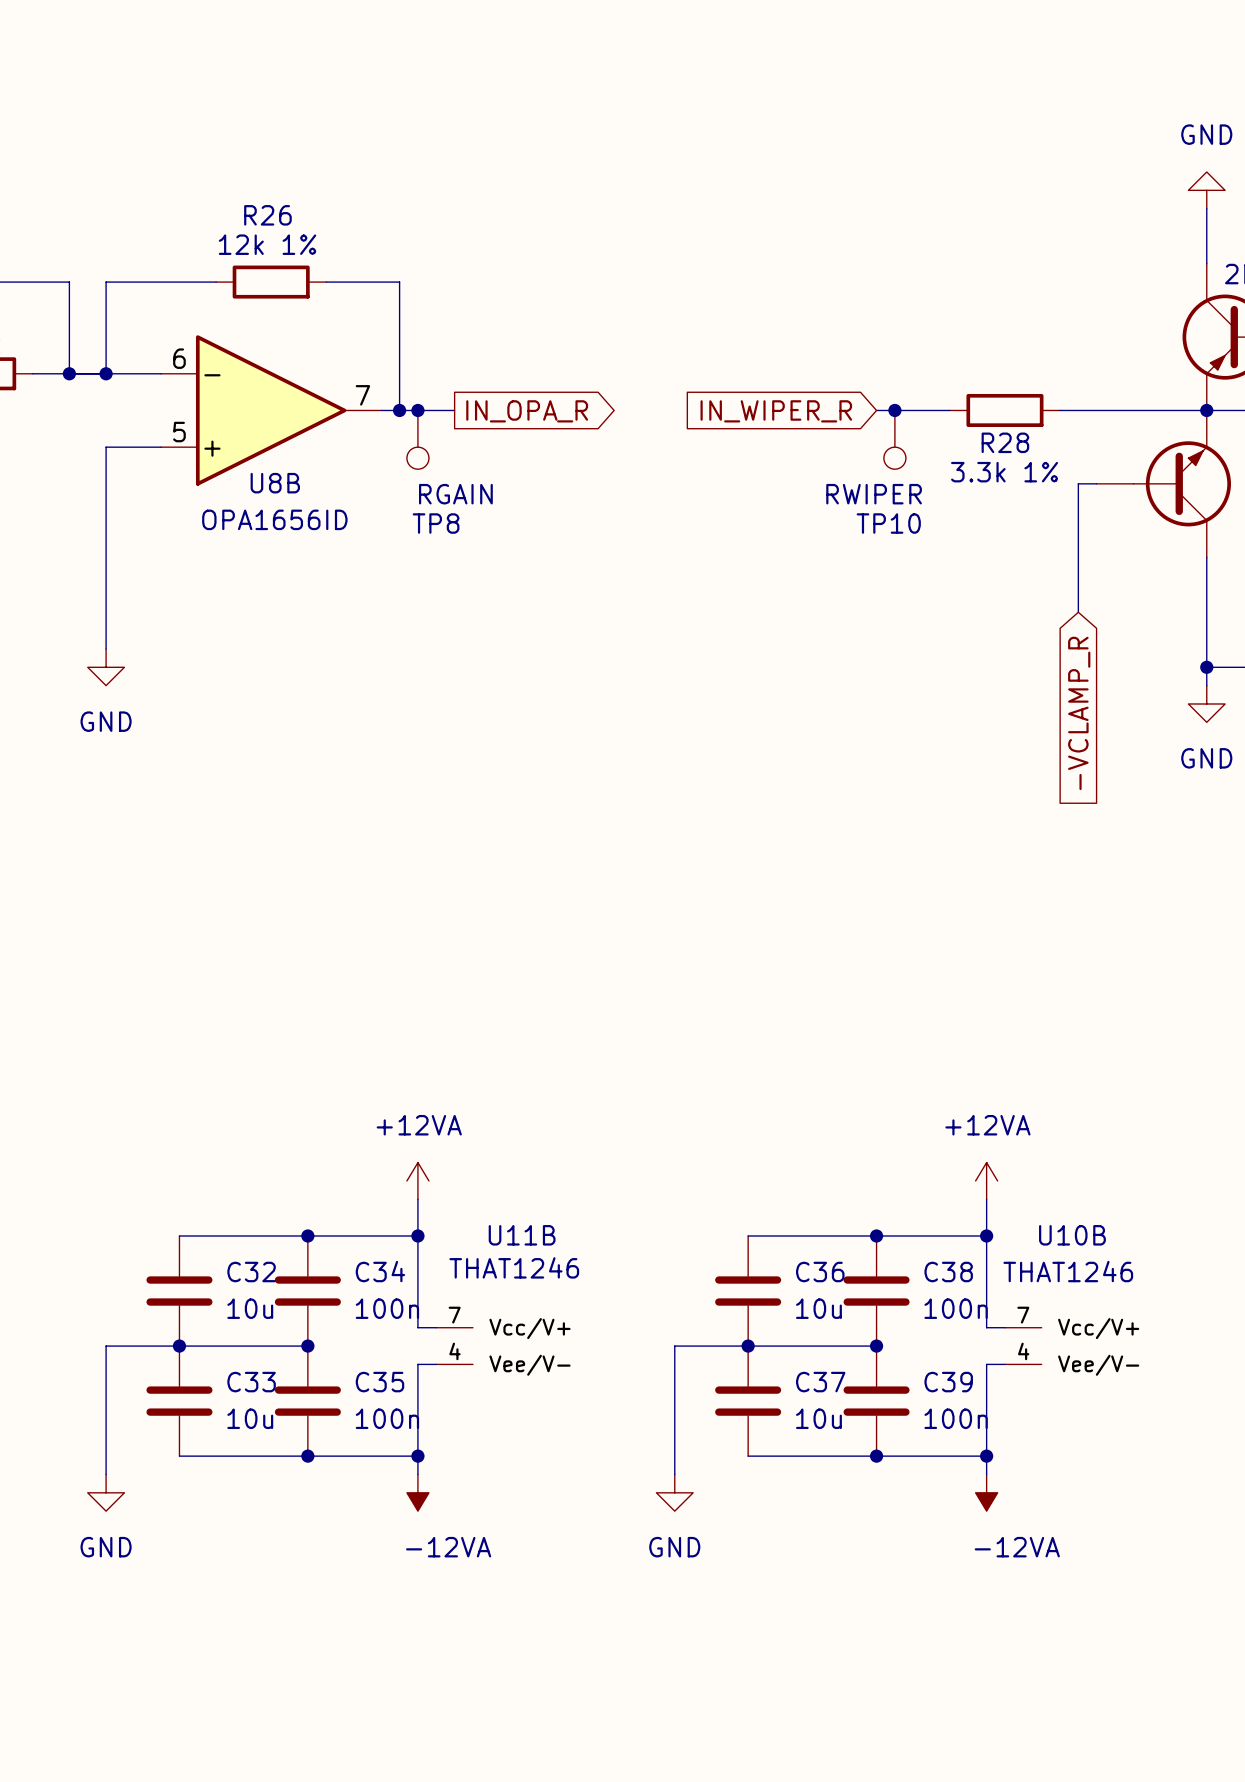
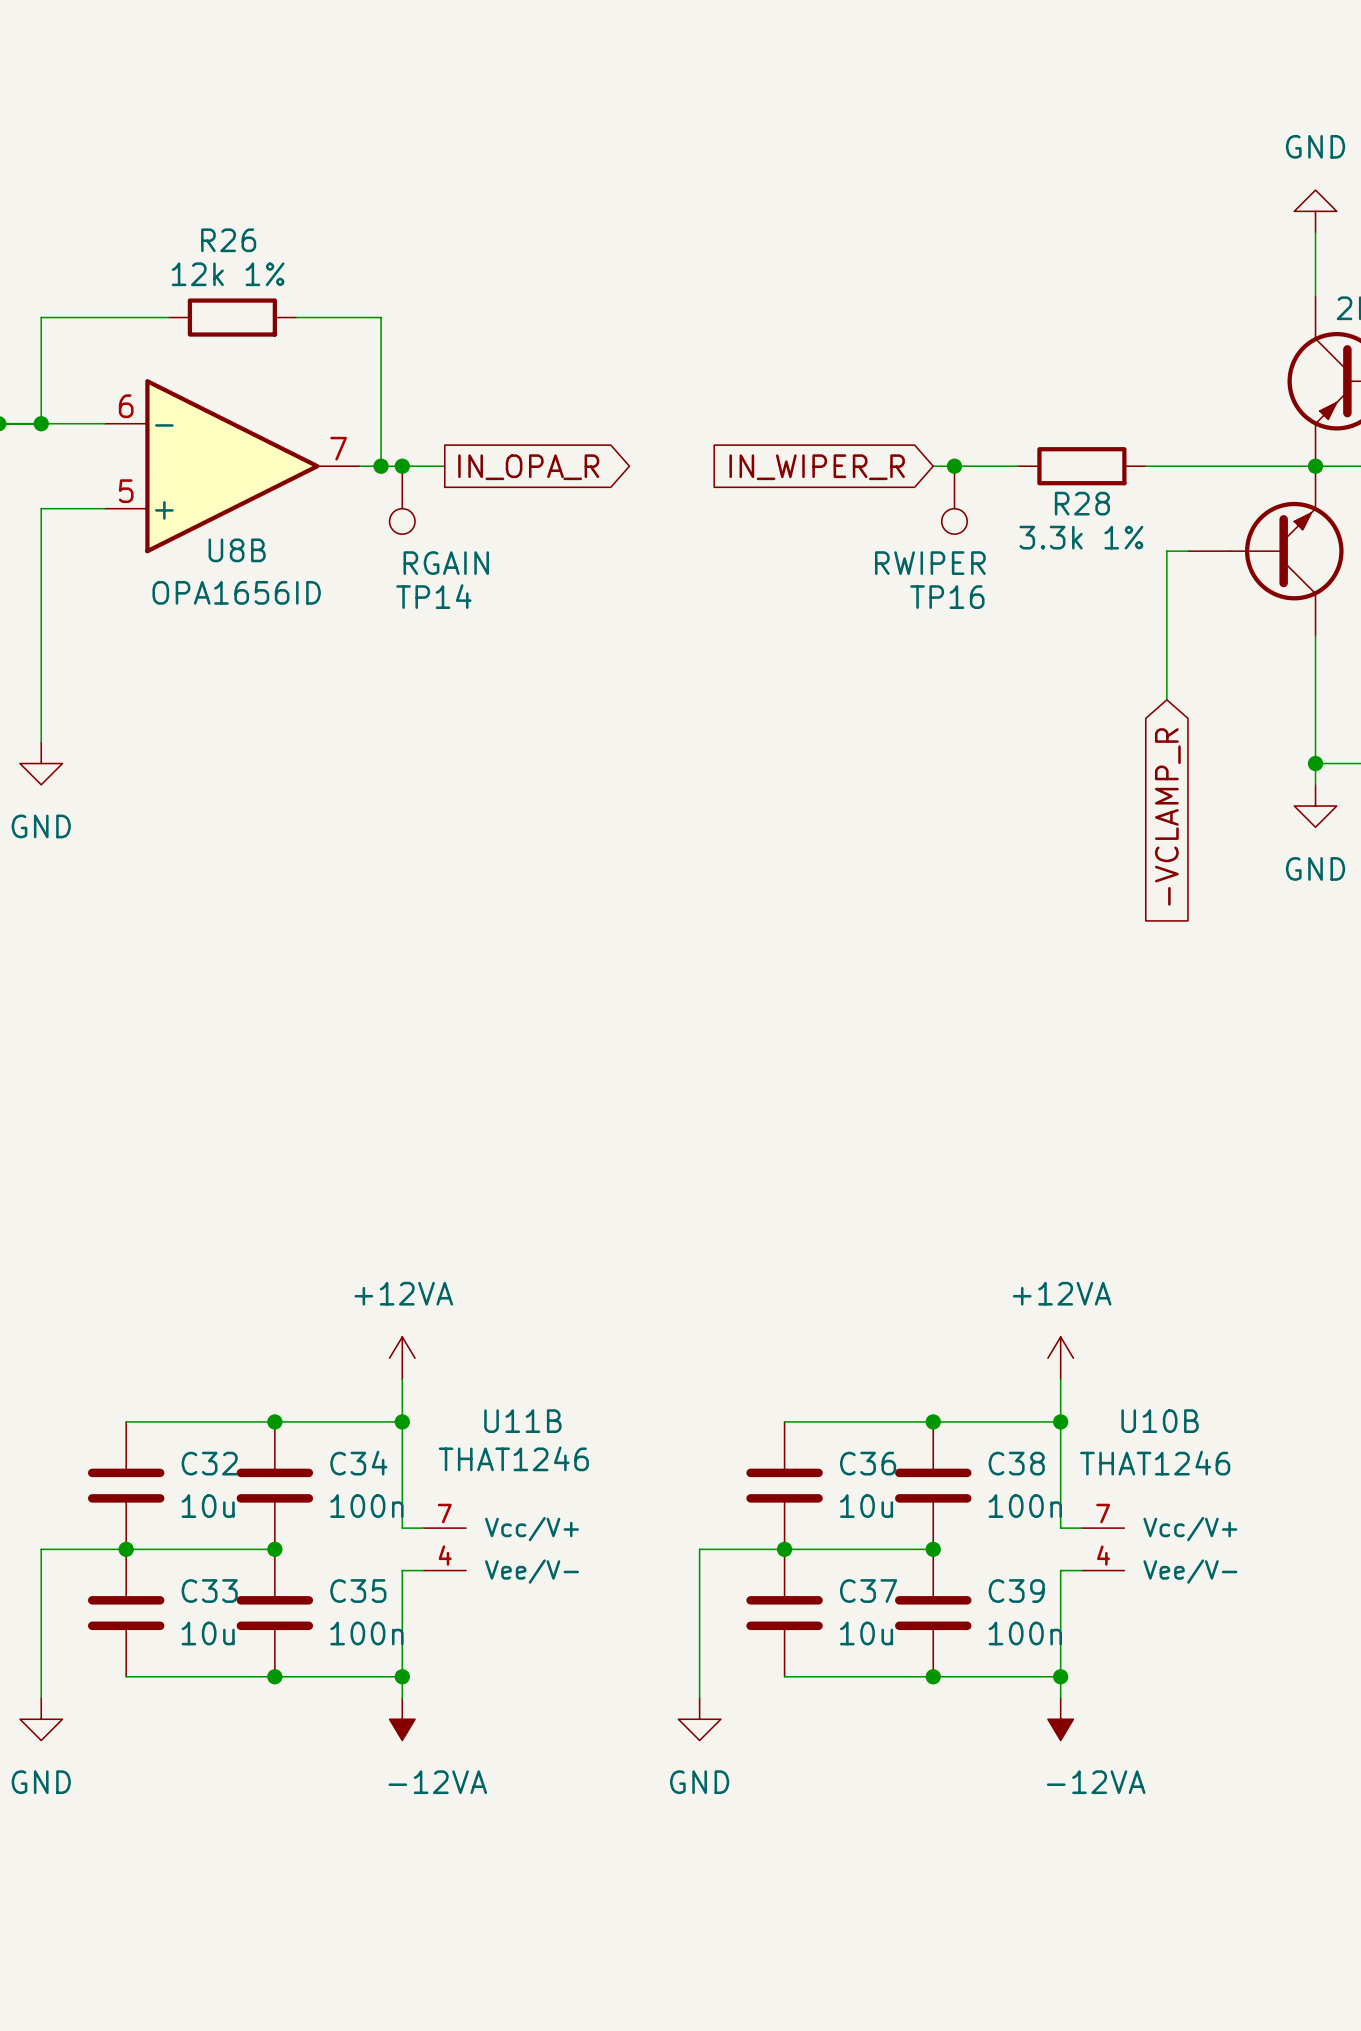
TP8 name: TP8 (436, 523) -> TP14 (433, 596)
TP10 name: TP10 (888, 523) -> TP16 (947, 597)

